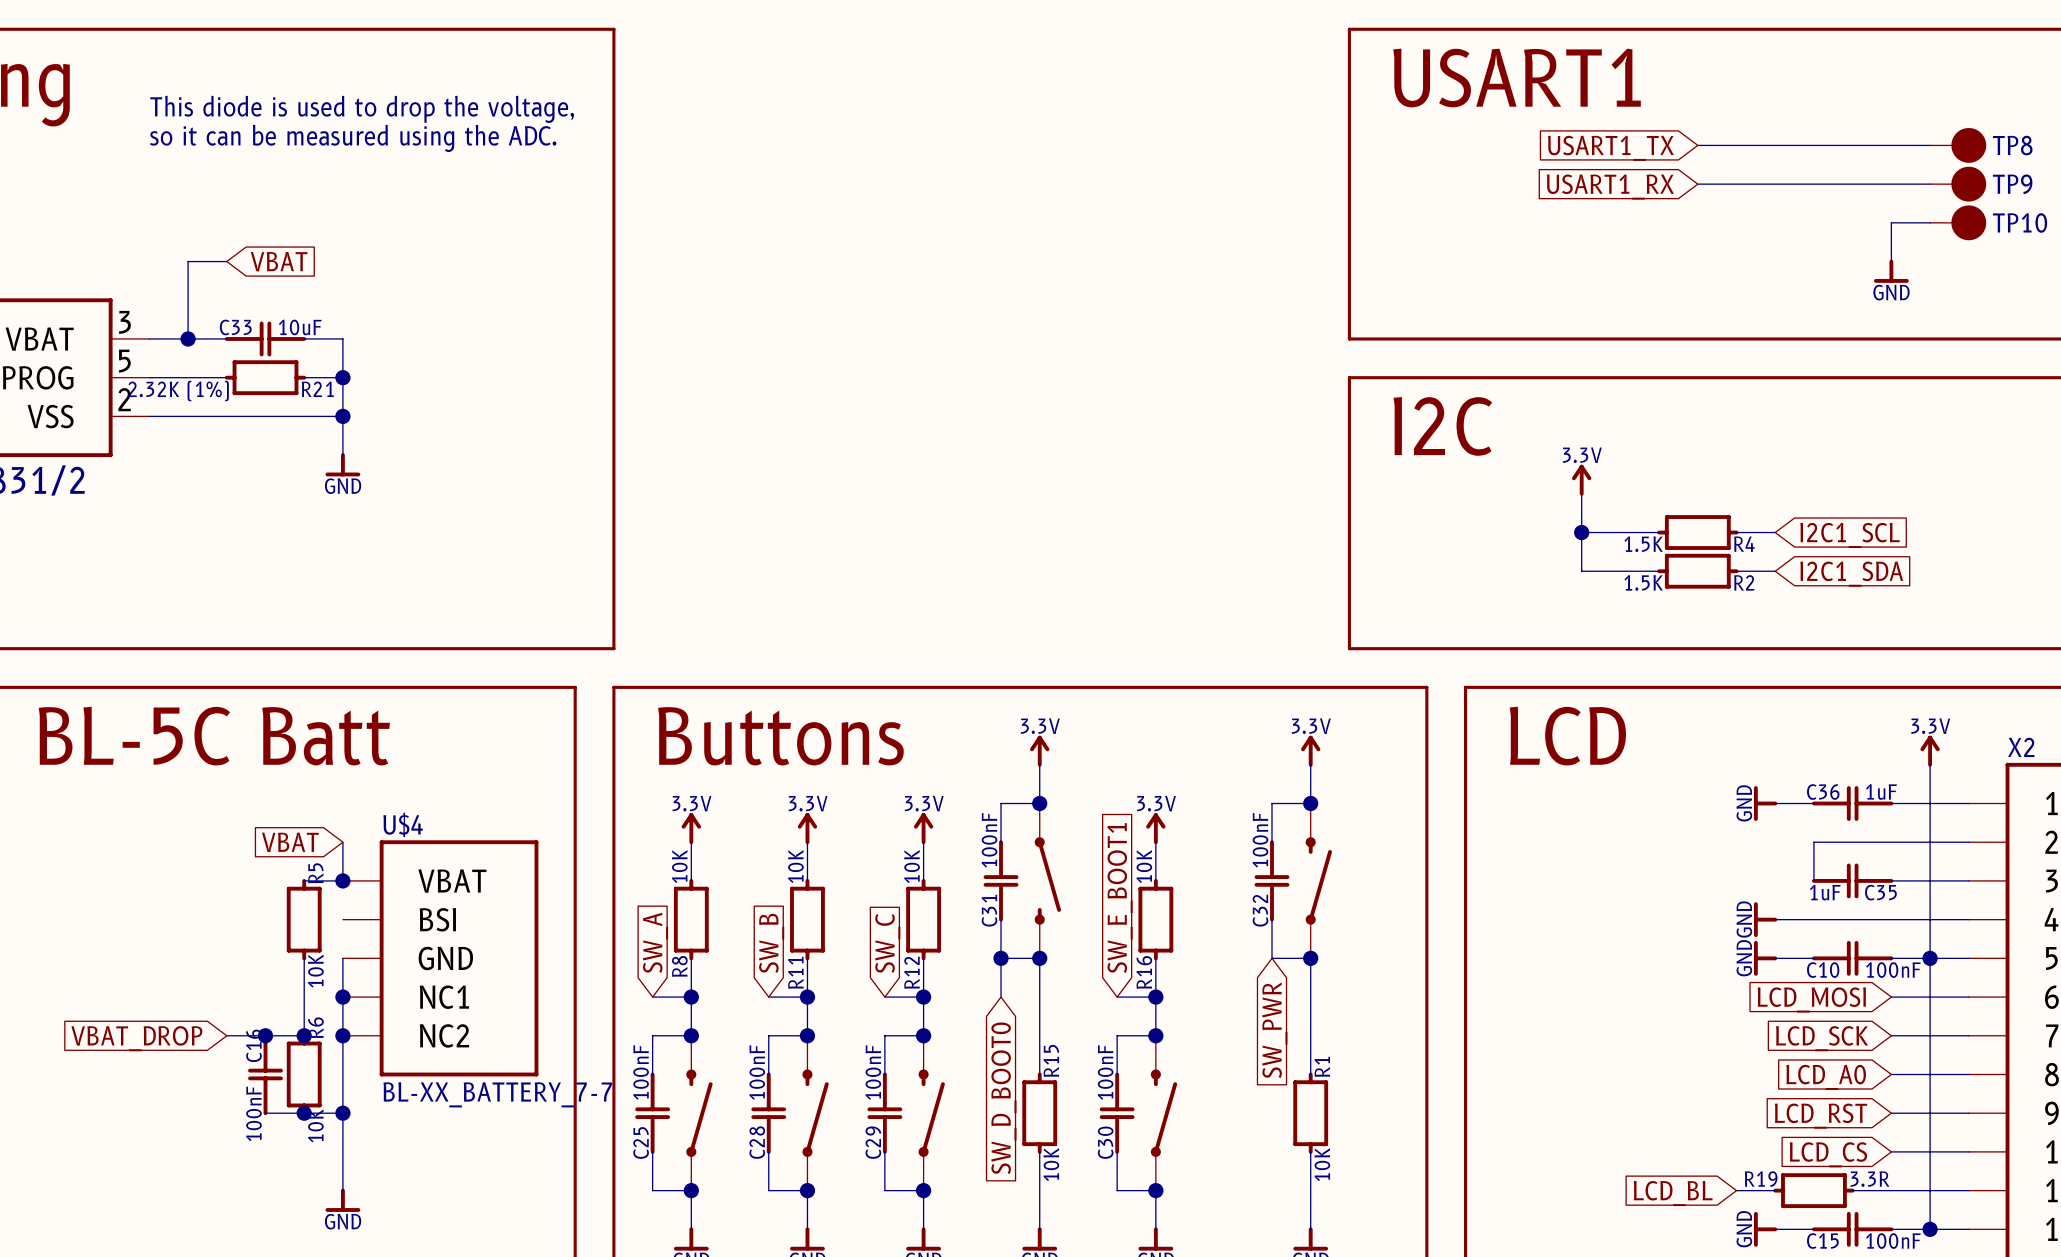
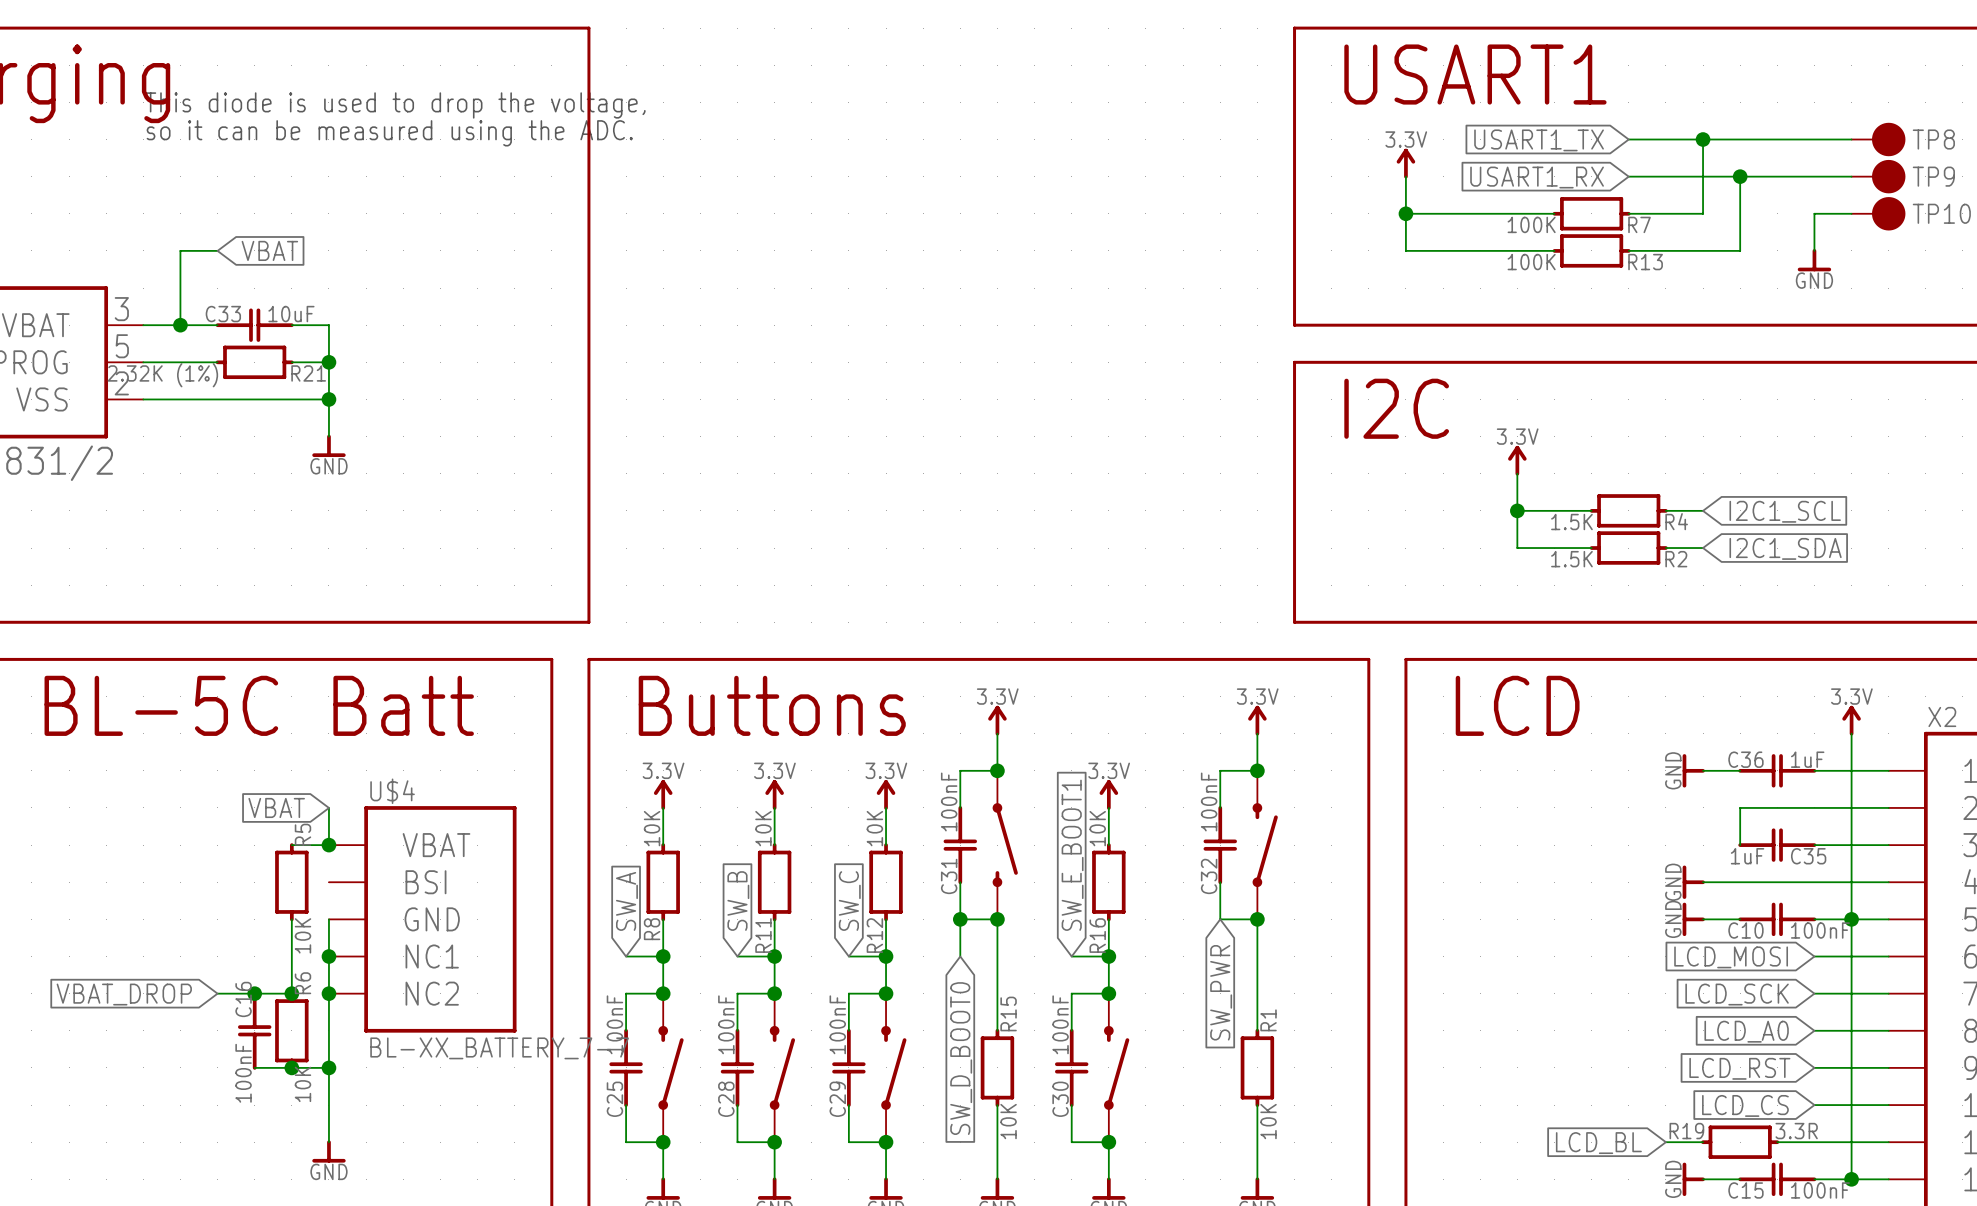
wire: none -> (1703, 139) (1703, 213) (1628, 213)
junction: none -> (1703, 139)
power symbol: none -> 3.3V (1405, 163)
wire: none -> (1405, 176) (1405, 250) (1554, 250)
wire: none -> (1740, 176) (1740, 250) (1628, 250)
junction: none -> (1740, 176)
wire: none -> (1405, 213) (1554, 213)
junction: none -> (1405, 213)
R7: none -> 100K (1591, 213)
R13: none -> 100K (1591, 250)

